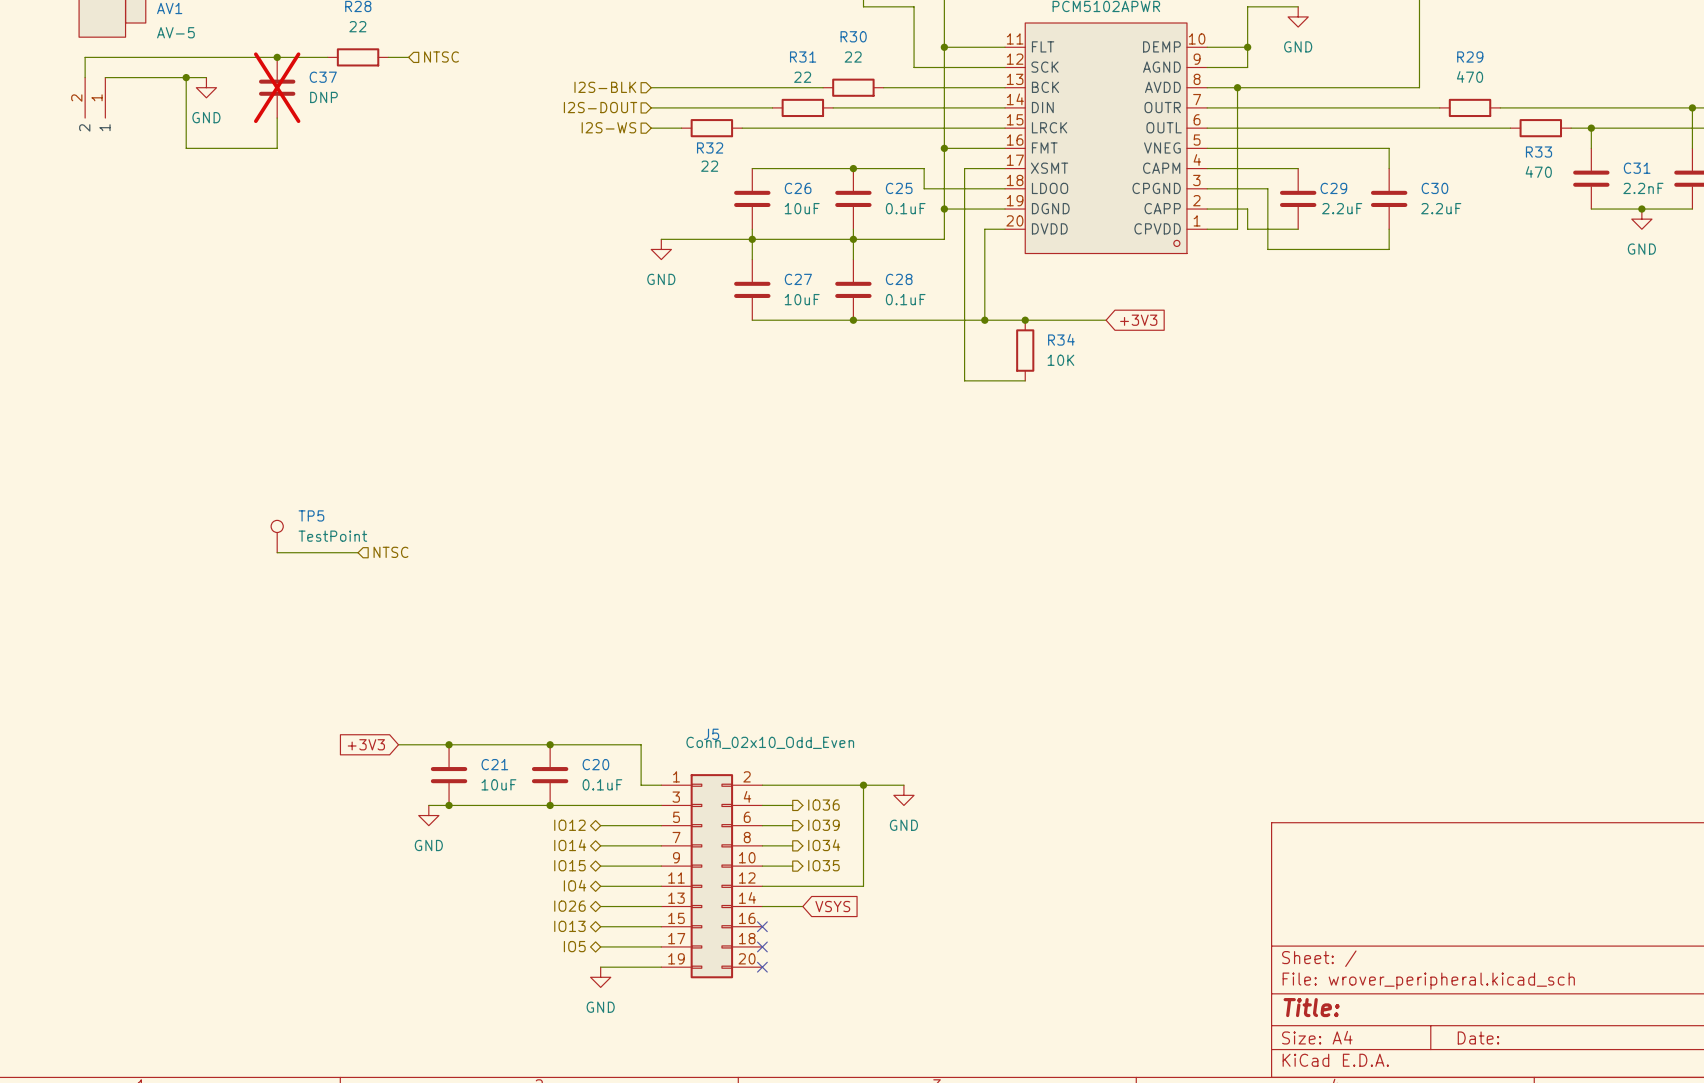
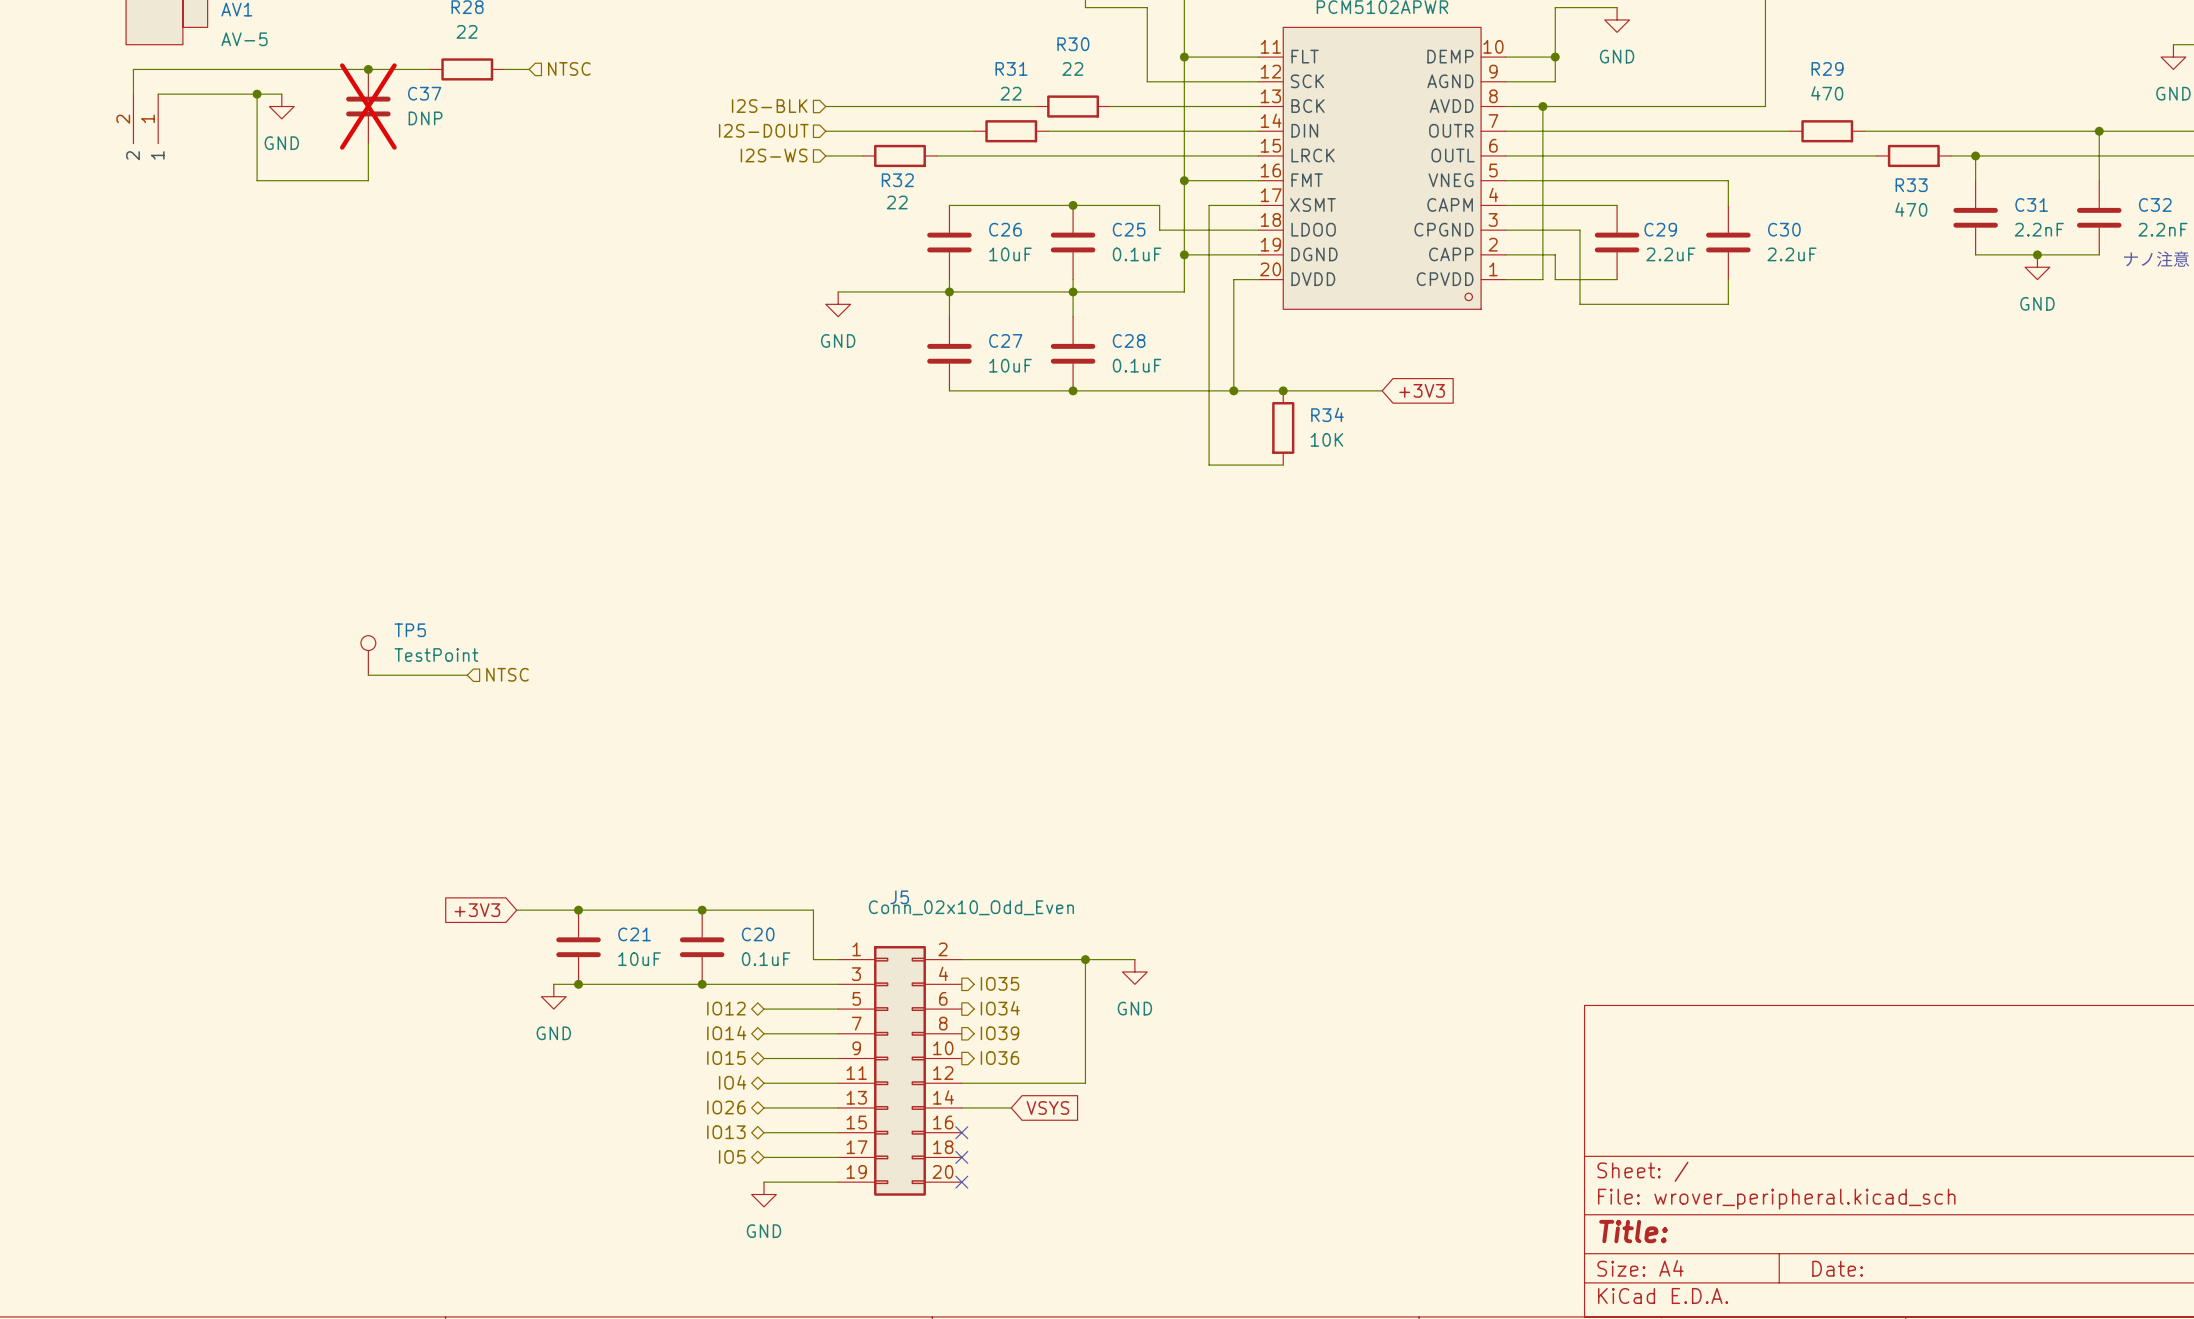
wire: (762, 805) (792, 805) -> none
hierarchical label position: IO36 (823, 805) -> IO36 (999, 1058)
wire: (762, 825) (792, 825) -> none
hierarchical label position: IO39 (823, 825) -> IO39 (999, 1033)
wire: (762, 845) (792, 845) -> none
hierarchical label position: IO34 (824, 845) -> IO34 (1000, 1008)
hierarchical label position: IO35 (823, 865) -> IO35 (999, 983)
wire: (762, 866) (792, 866) -> none

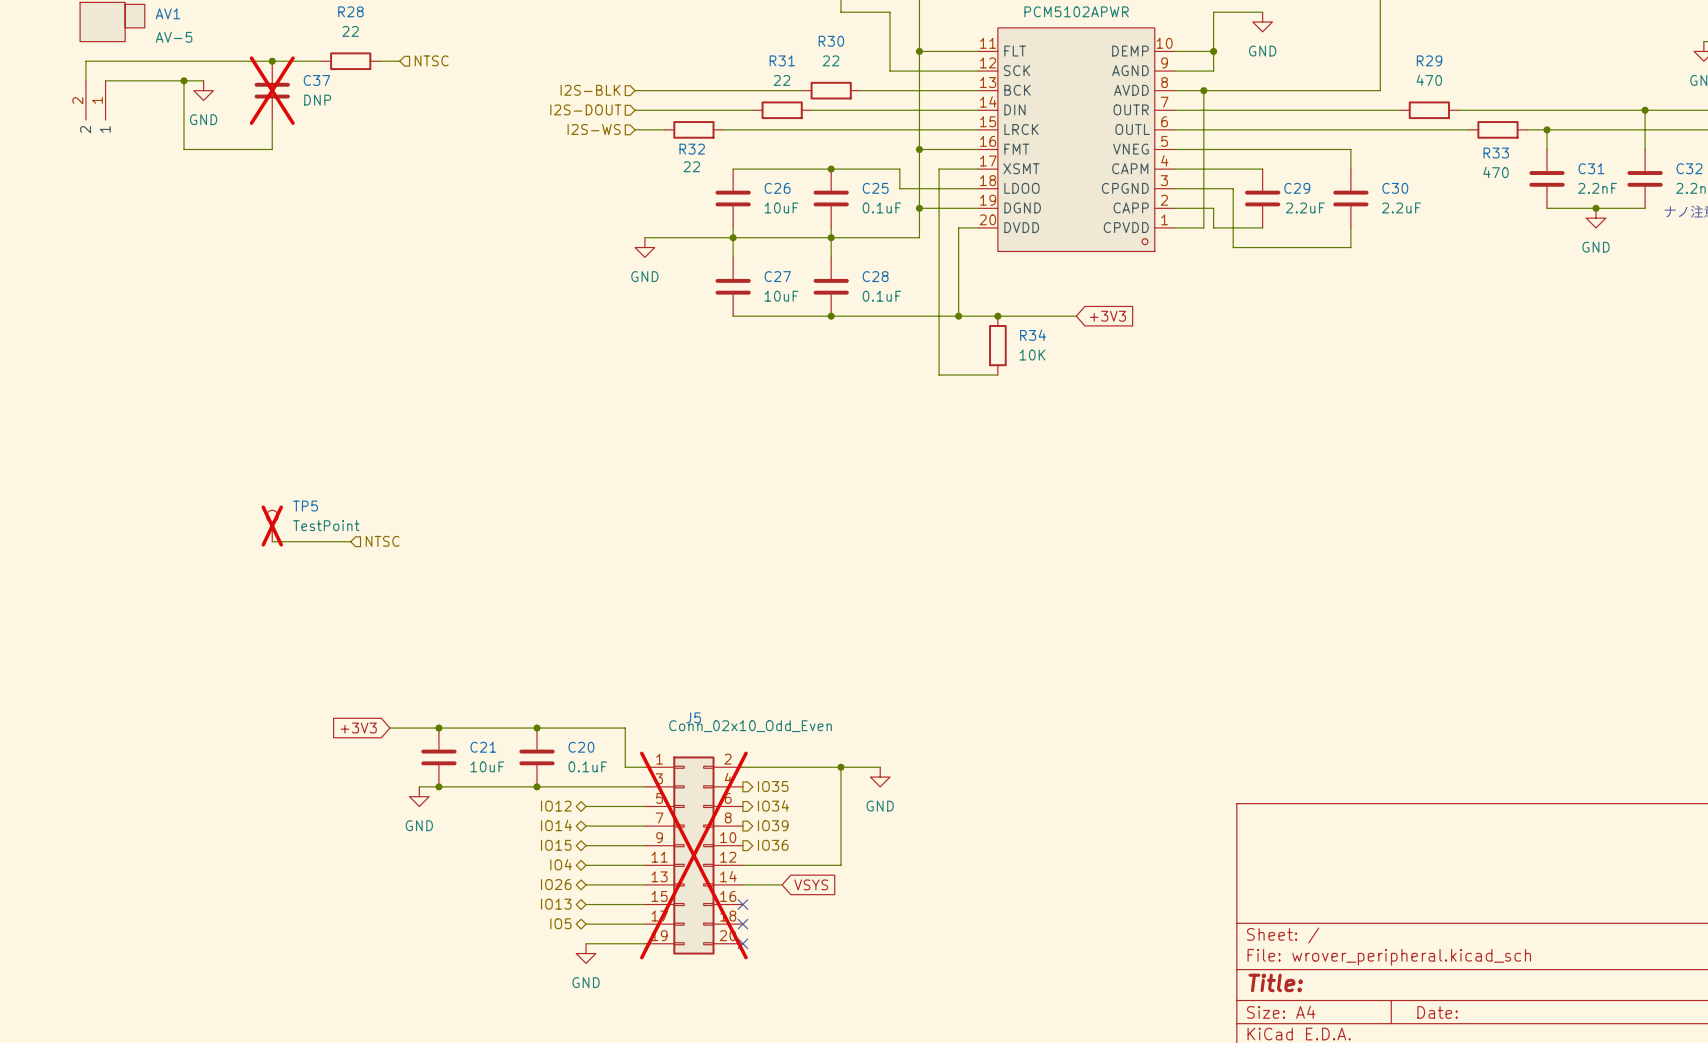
TP5 do-not-place cross: none -> (272, 526)
J5 do-not-place cross: none -> (693, 855)

